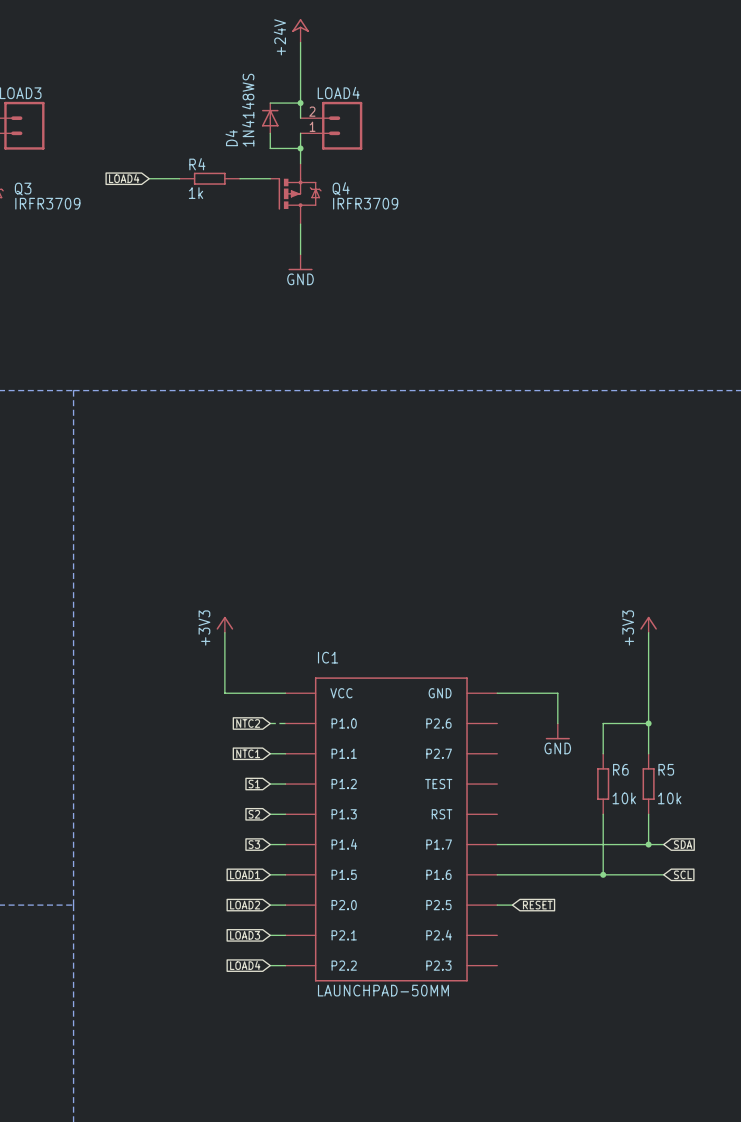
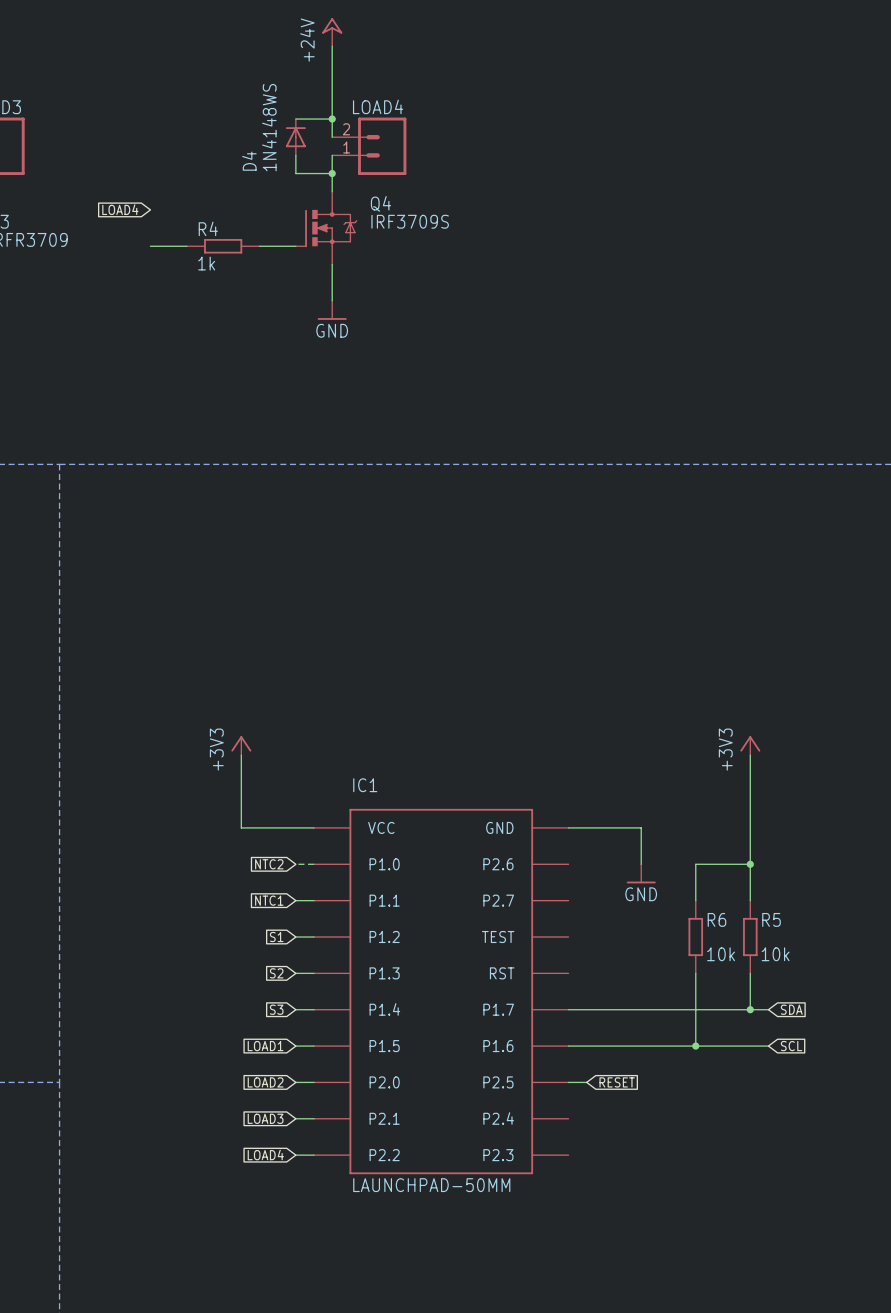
Q4 symbol: [269, 163, 322, 225] -> [295, 191, 358, 265]
wire: (149, 178) (179, 178) -> (150, 246) (186, 246)
R4 position: (209, 178) -> (223, 246)
wire: (240, 178) (270, 178) -> (259, 246) (295, 246)
Q4 name position: Q4 (341, 188) -> Q4 (380, 203)
Q4 value: IRFR3709 (365, 203) -> IRF3709S (410, 221)

